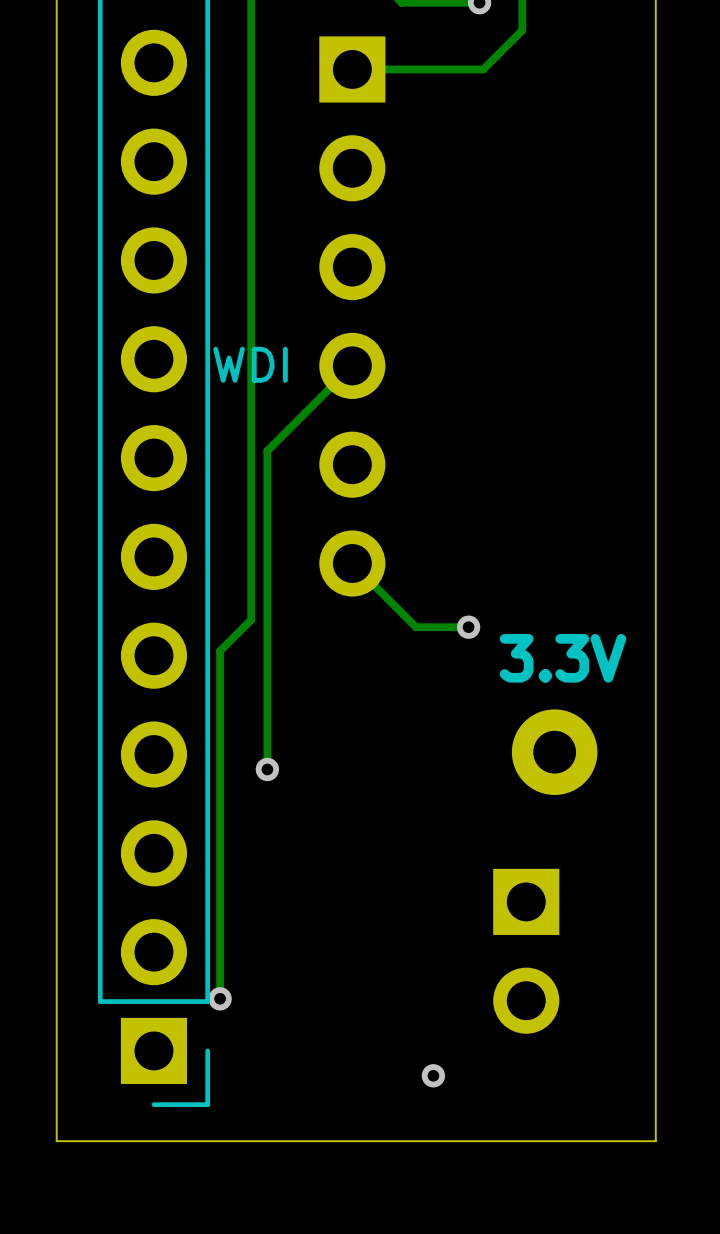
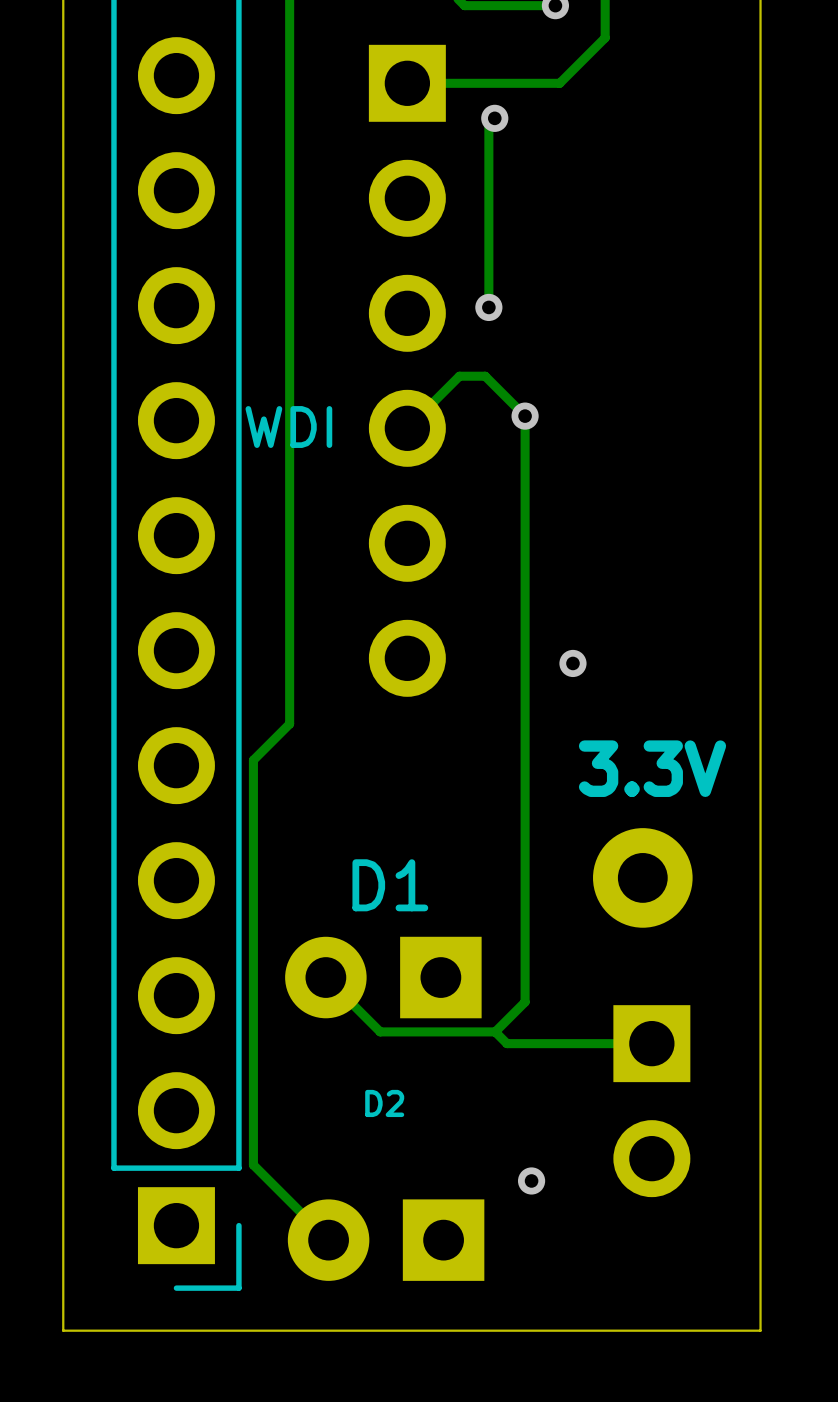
track: none -> (494, 118) (488, 124) (488, 307)
via: none -> (494, 118)
via: none -> (488, 307)
via: none -> (525, 416)
track: (352, 365) (267, 450) (267, 769) -> (407, 428) (459, 376) (485, 376) (525, 416) (525, 1002) (495, 1031)
track: (352, 563) (416, 627) (468, 627) -> none
via position: (468, 627) -> (572, 663)
via: (267, 769) -> none
track: none -> (325, 977) (380, 1031) (495, 1031)
D1: none -> (383, 977)
track: none -> (495, 1031) (506, 1043) (651, 1043)
part position: (526, 951) -> (651, 1101)
track: none -> (253, 1164) (328, 1240)
via: (220, 998) -> none
D2: none -> (386, 1240)
via position: (433, 1075) -> (531, 1180)

